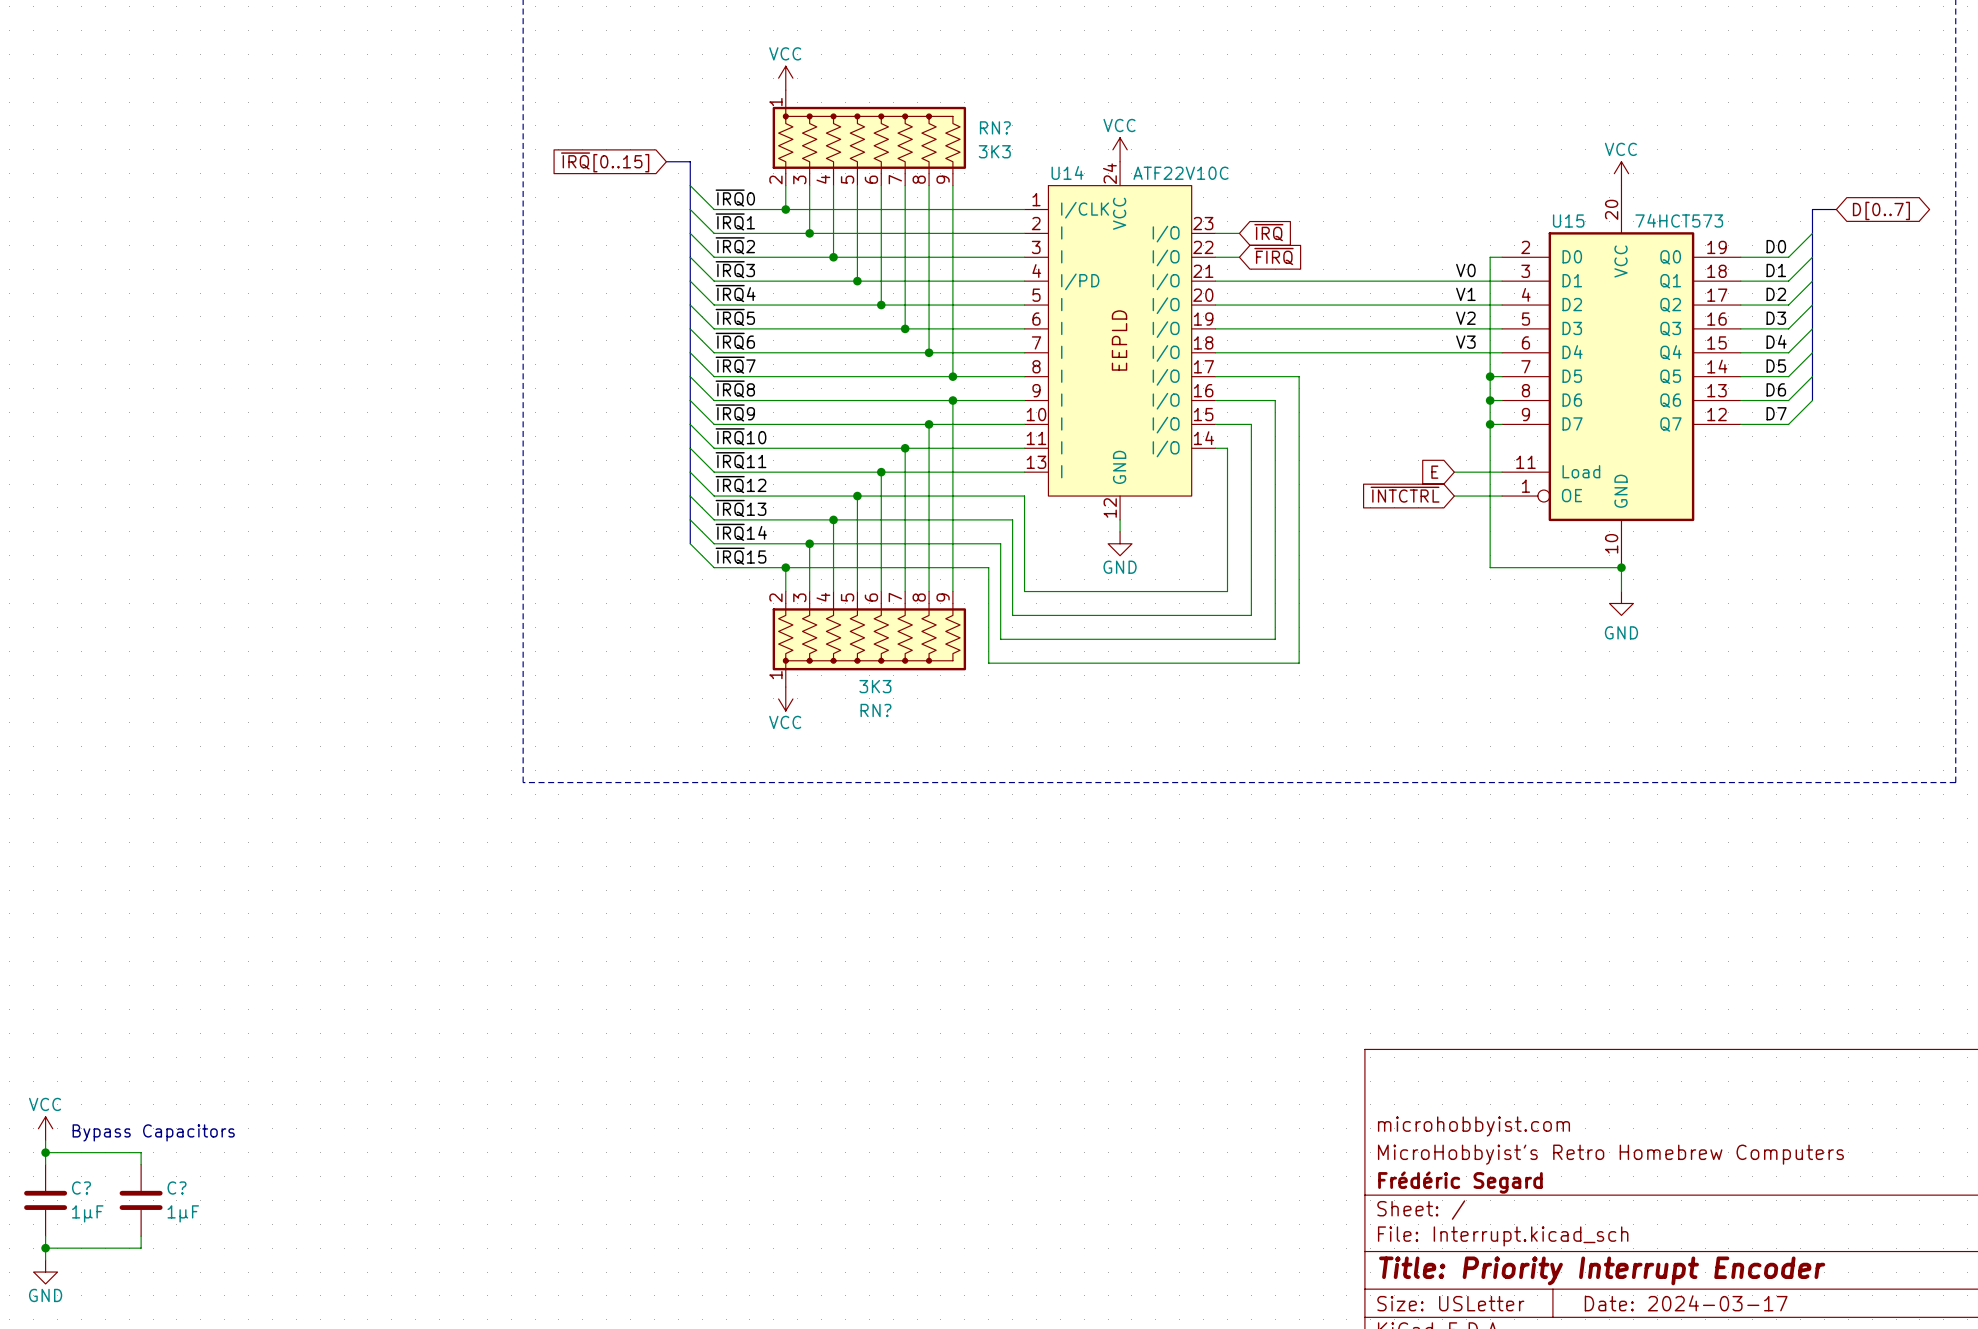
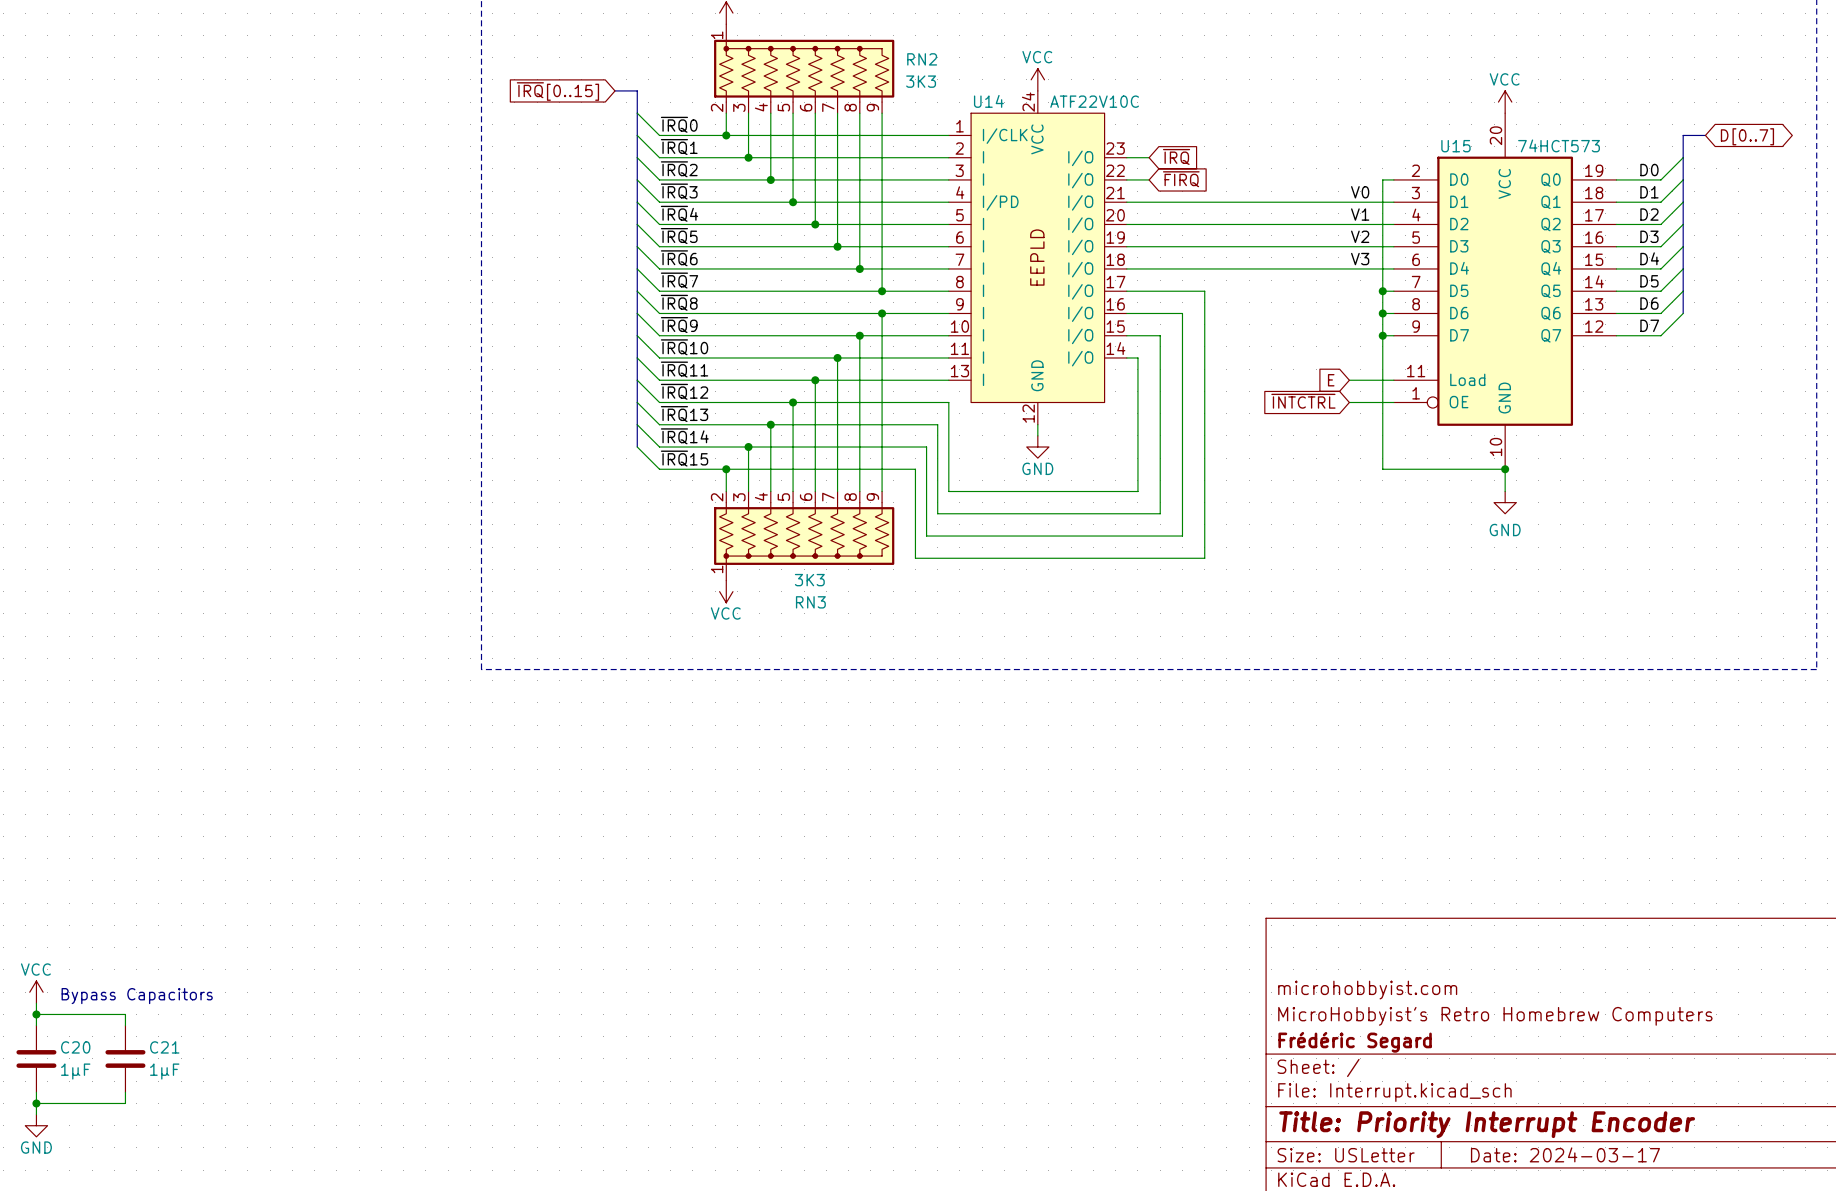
RN? name: RN? (995, 127) -> RN2 (922, 59)
RN? name: RN? (875, 710) -> RN3 (810, 602)
C? name: C? (81, 1188) -> C20 (75, 1047)
C? name: C? (177, 1188) -> C21 (164, 1047)

